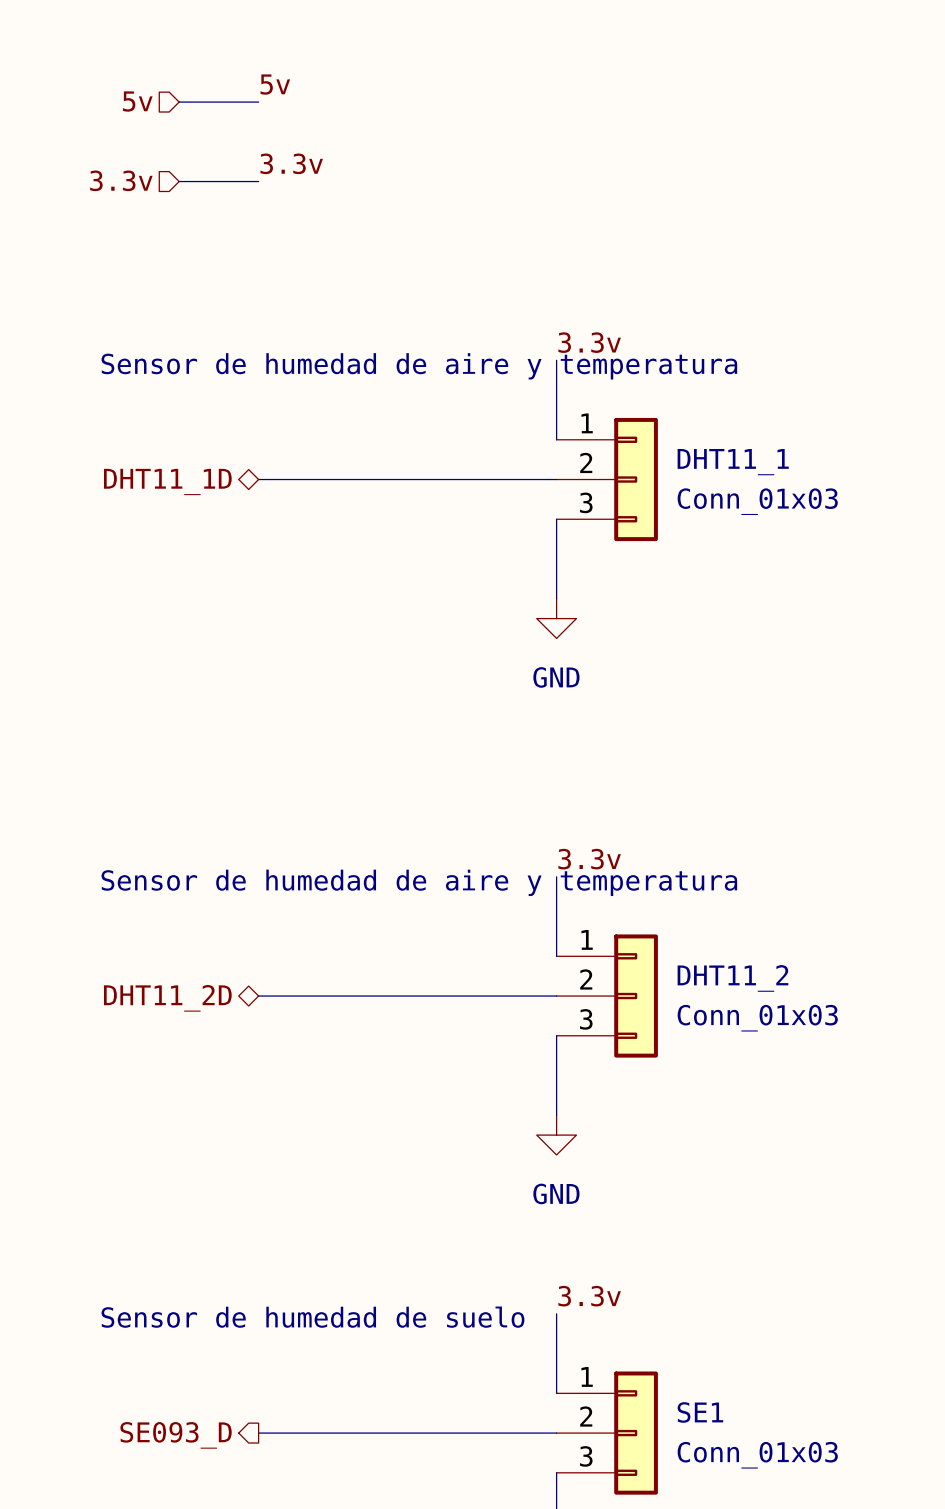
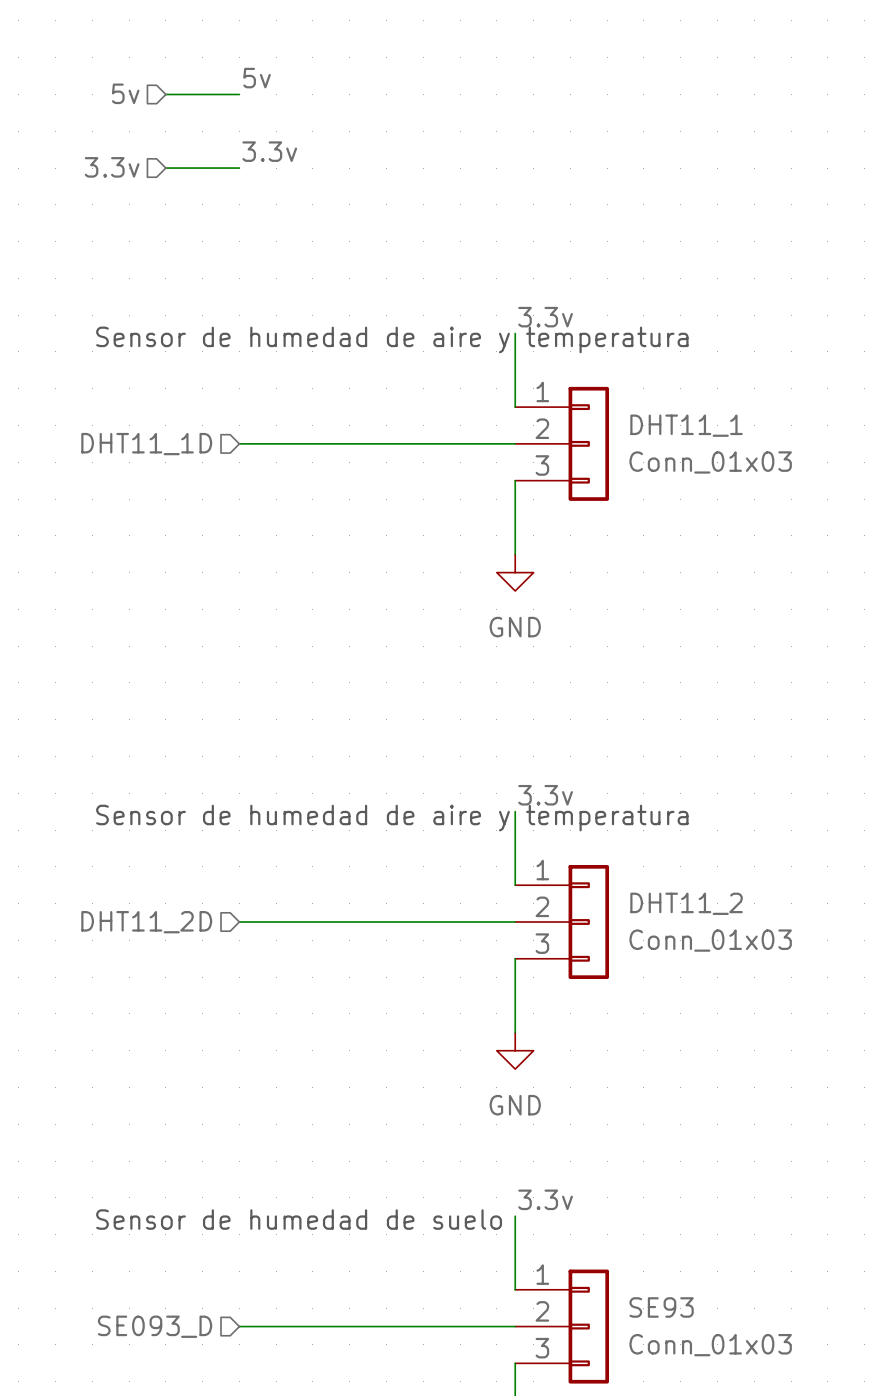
hierarchical label shape: bidirectional (167, 481) -> input (146, 444)
hierarchical label shape: bidirectional (167, 998) -> input (146, 922)
SE1 name: SE1 (700, 1412) -> SE93 (661, 1307)
hierarchical label shape: output (176, 1435) -> input (155, 1326)

